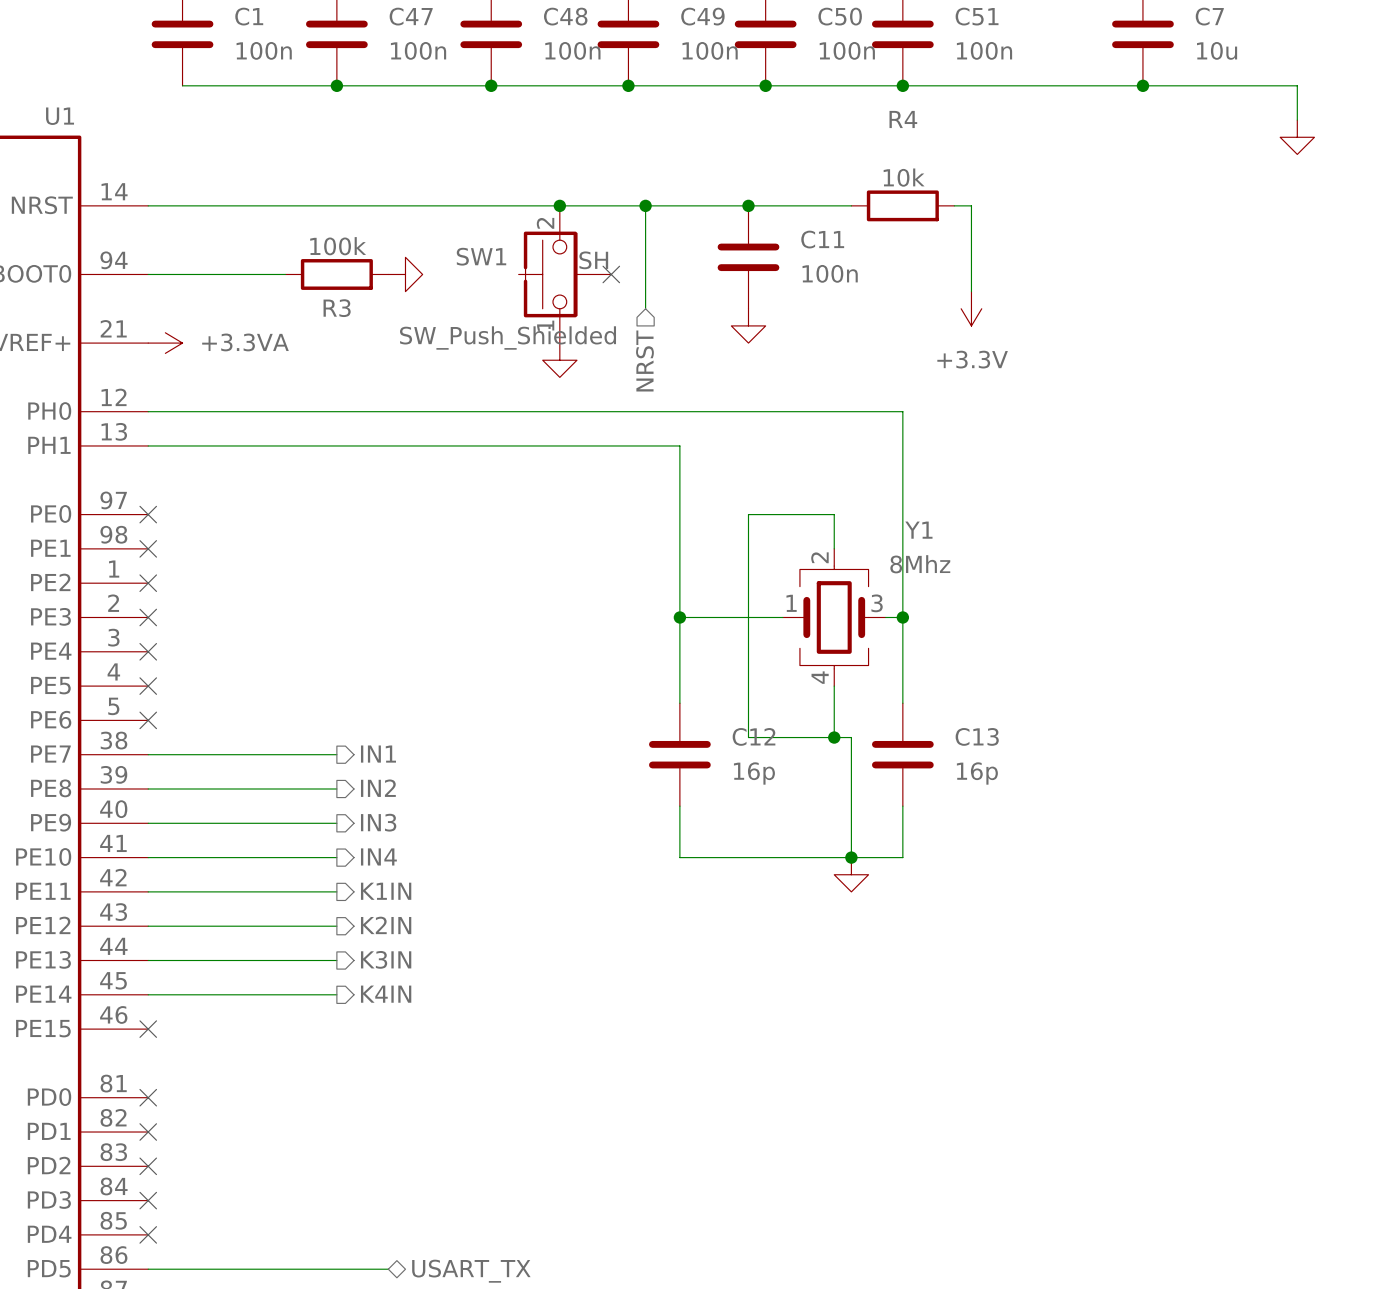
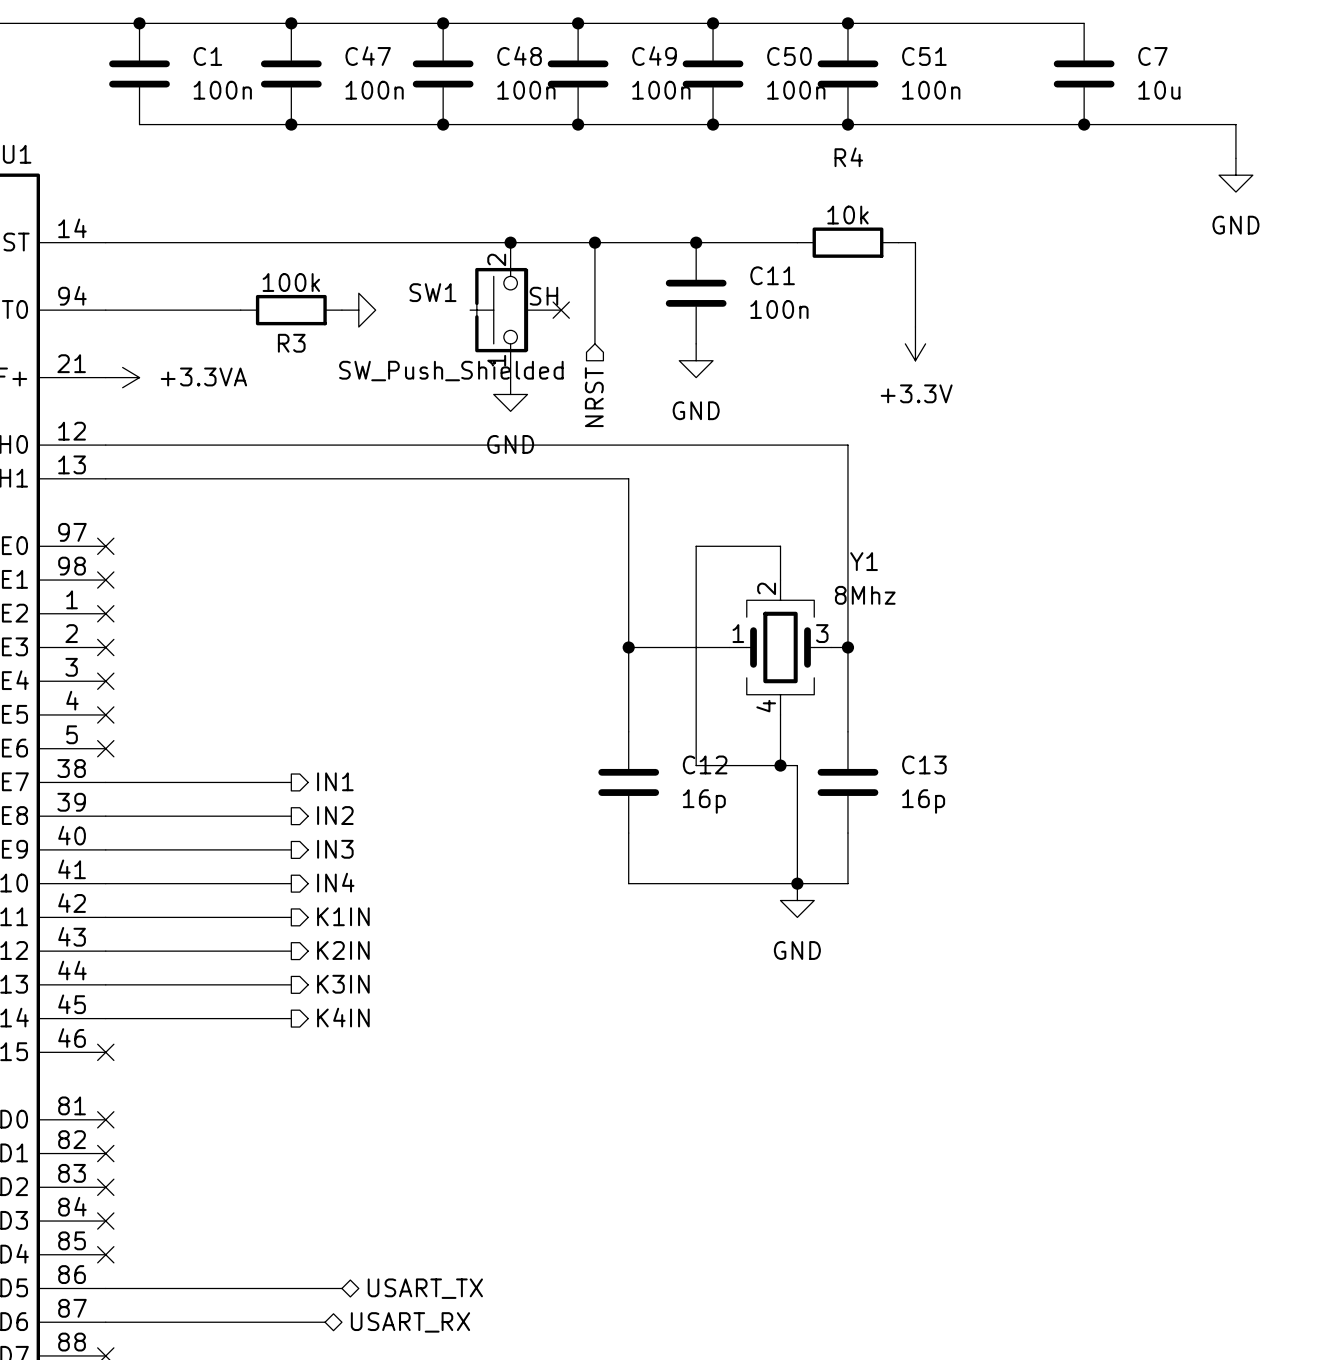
power symbol text: none -> GND (1235, 225)
power symbol text: none -> GND (696, 410)
power symbol text: none -> GND (510, 444)
power symbol text: none -> GND (797, 950)

